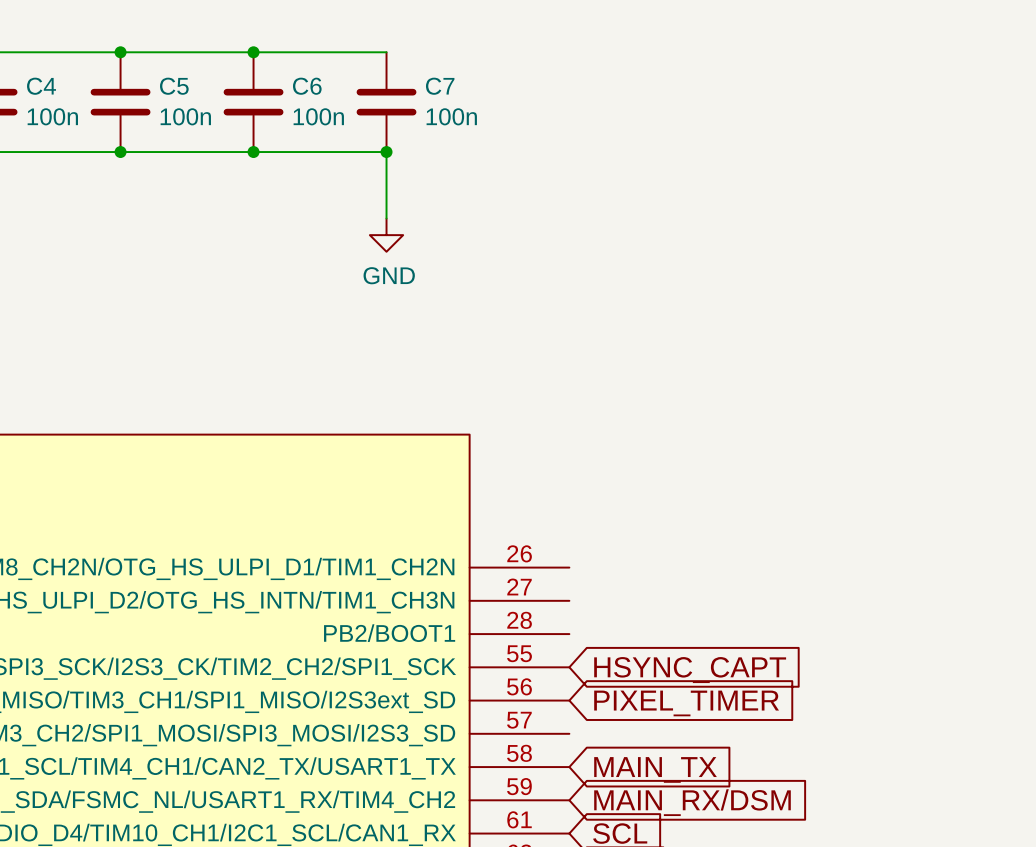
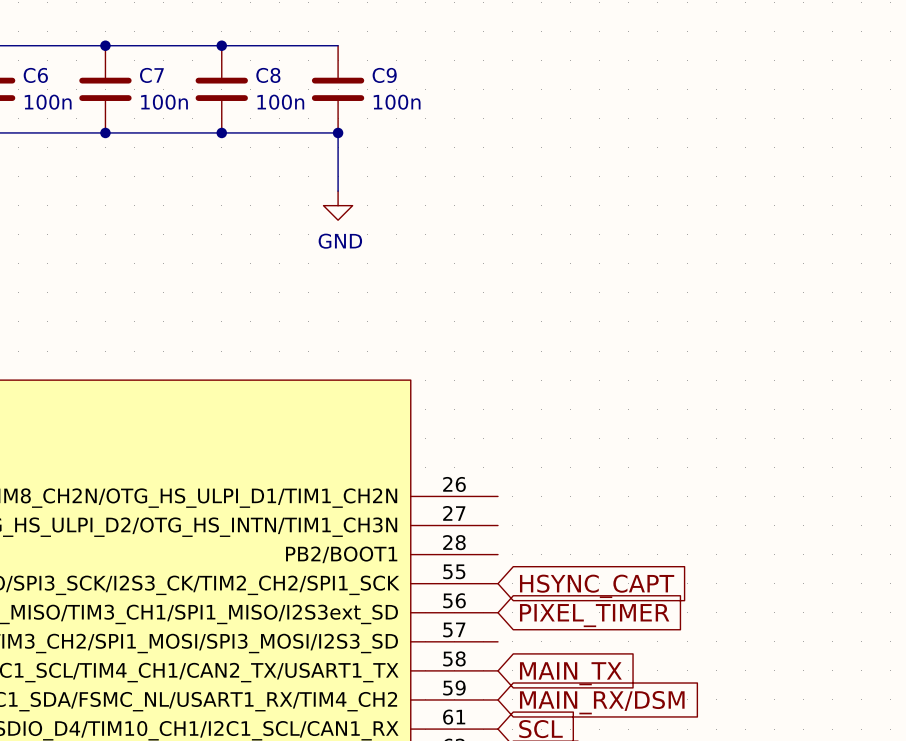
C4 name: C4 (41, 86) -> C6 (35, 75)
C5 name: C5 (174, 86) -> C7 (151, 75)
C6 name: C6 (307, 86) -> C8 (268, 75)
C7 name: C7 (440, 86) -> C9 (384, 75)

